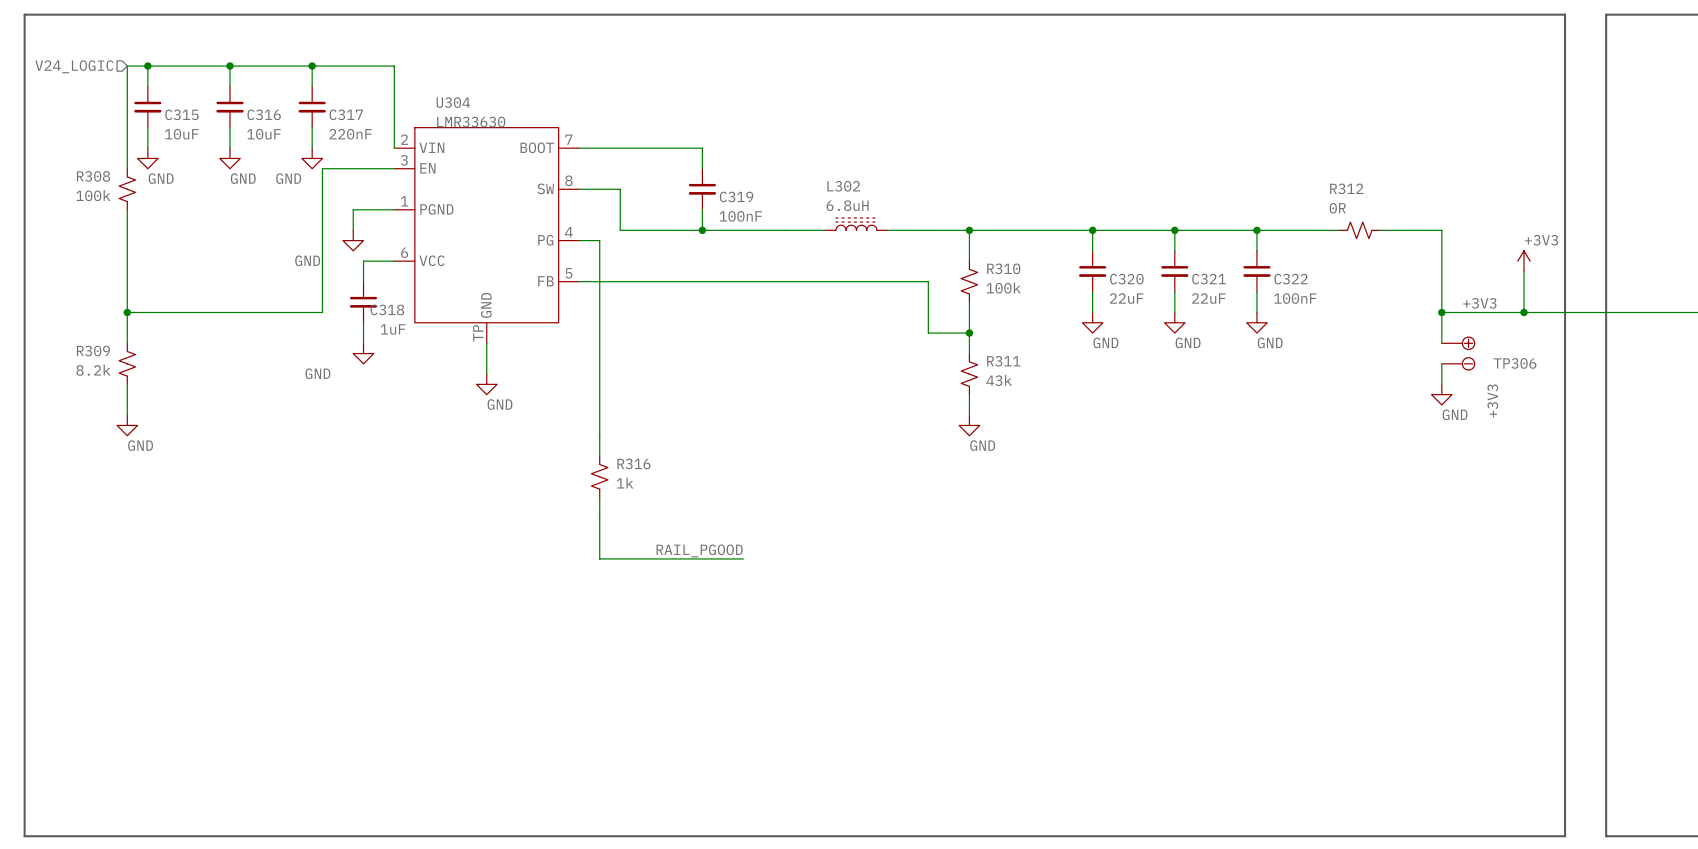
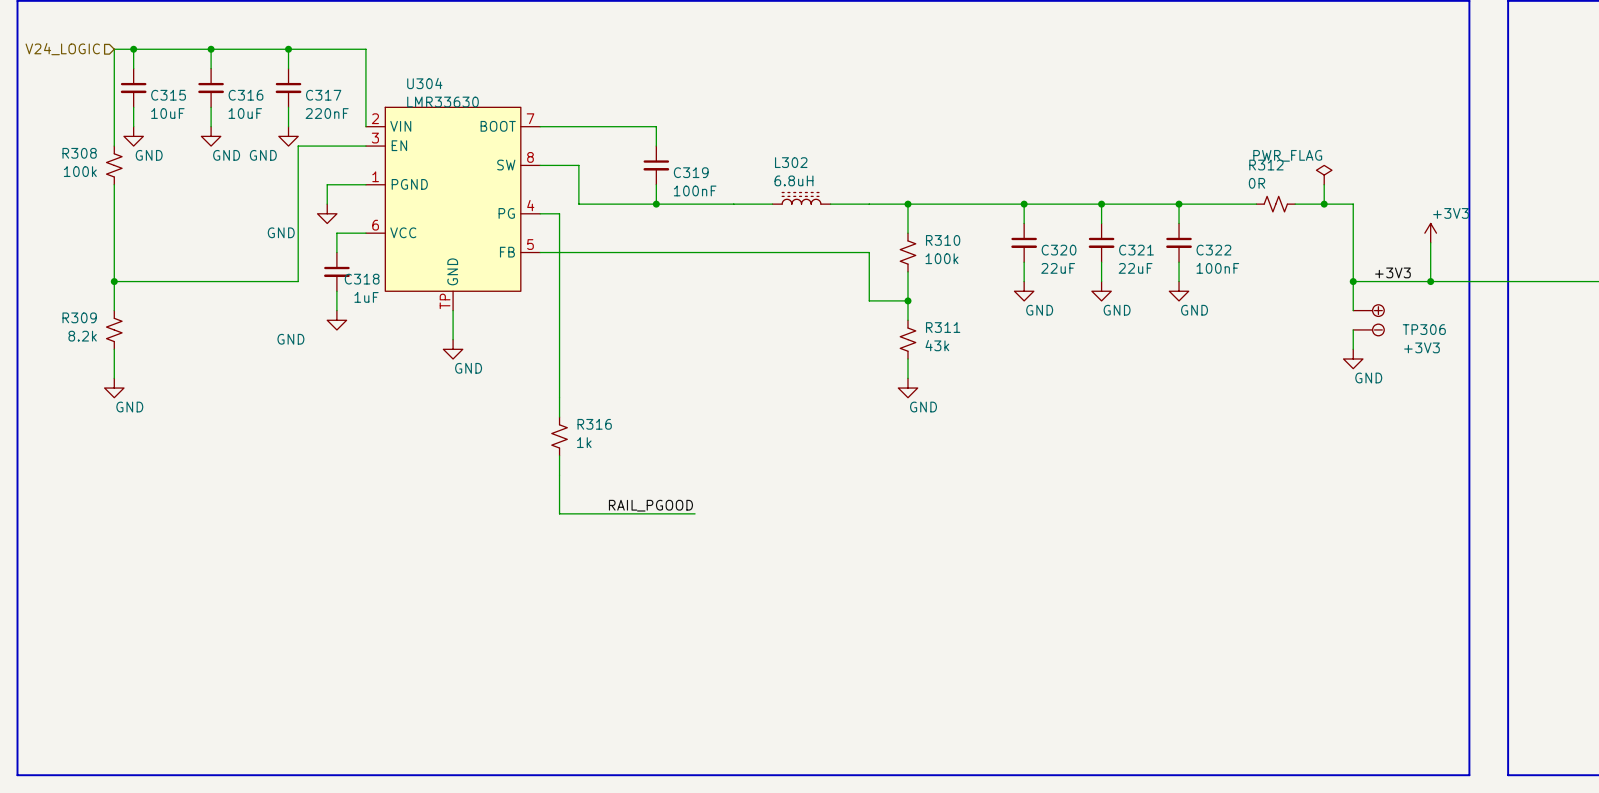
power symbol: none -> PWR_FLAG (1324, 175)
wire: none -> (1324, 184) (1324, 204)
junction: none -> (1324, 204)
TP306 value rotation: 0° (1492, 401) -> 90° clockwise (1421, 347)

